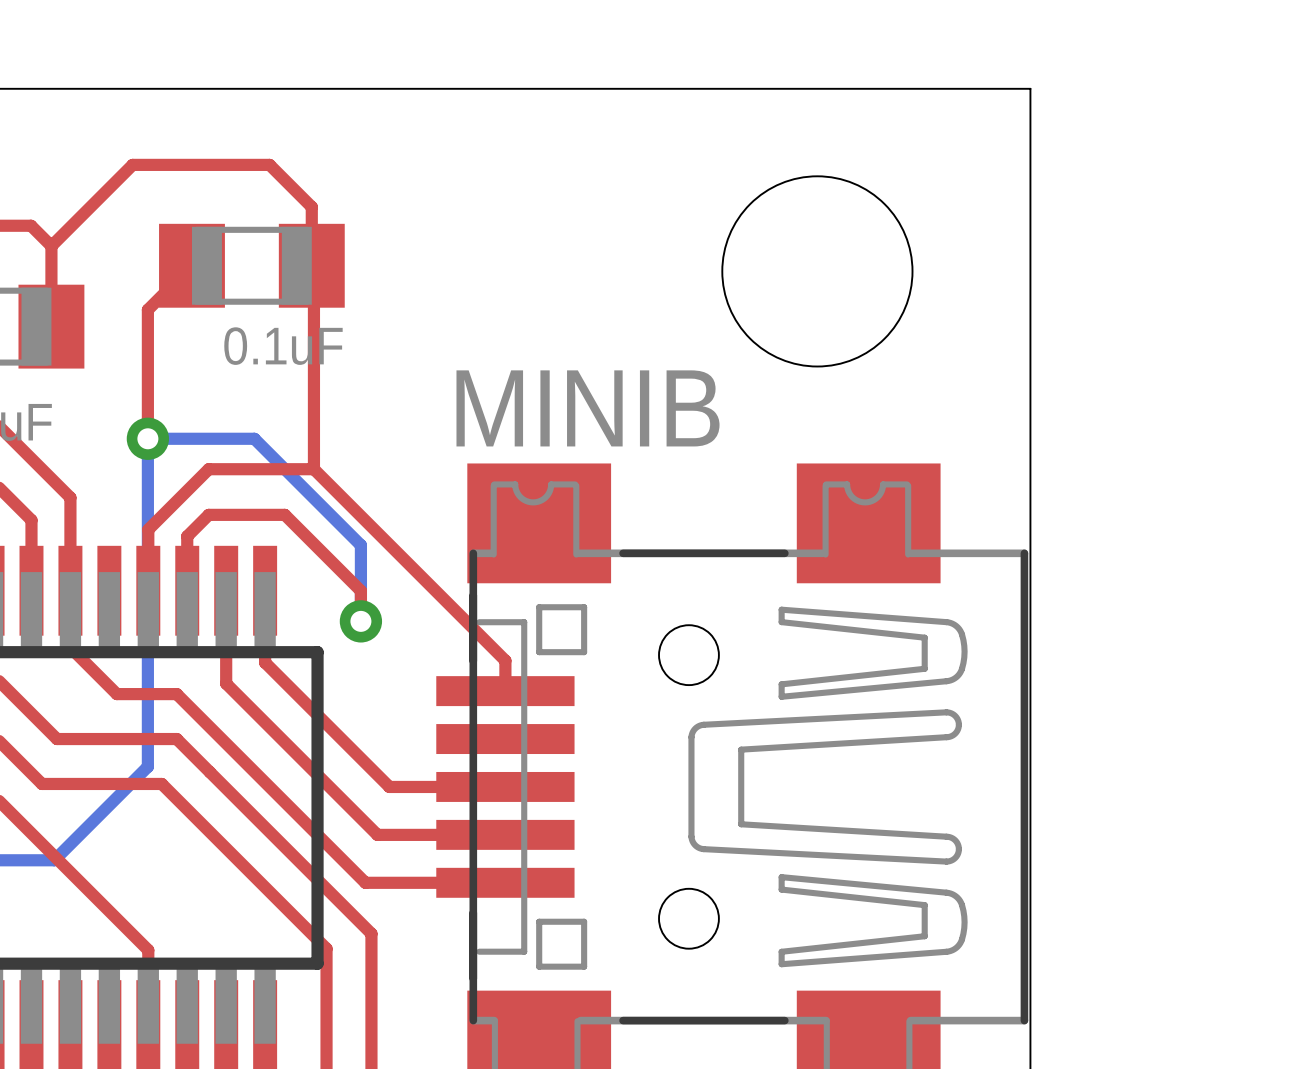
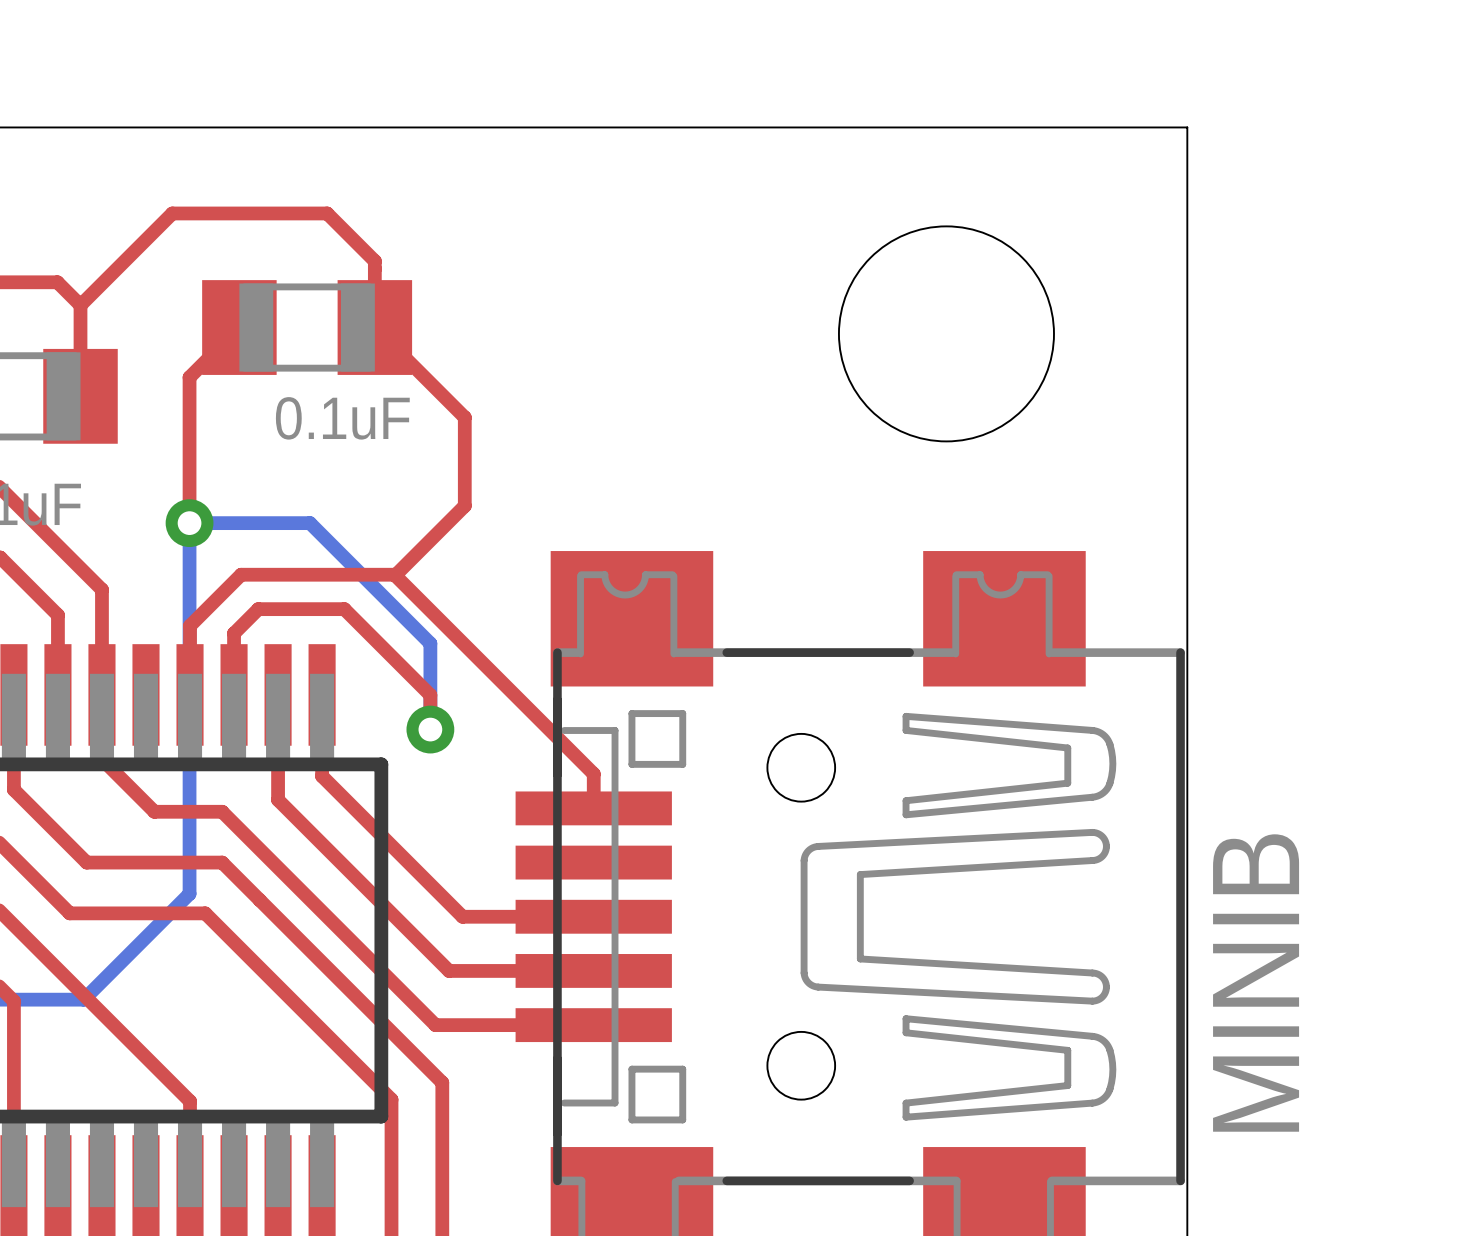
top track: (313, 267) (313, 469) -> (377, 329) (464, 417) (464, 505) (395, 574) (241, 574)
part value rotation: 0° (588, 408) -> 90° counterclockwise (1256, 983)
part value position: MINIB (588, 408) -> MINIB (1256, 983)
top track: (313, 469) (329, 484) -> none
top track: (313, 469) (208, 469) (193, 484) -> none

